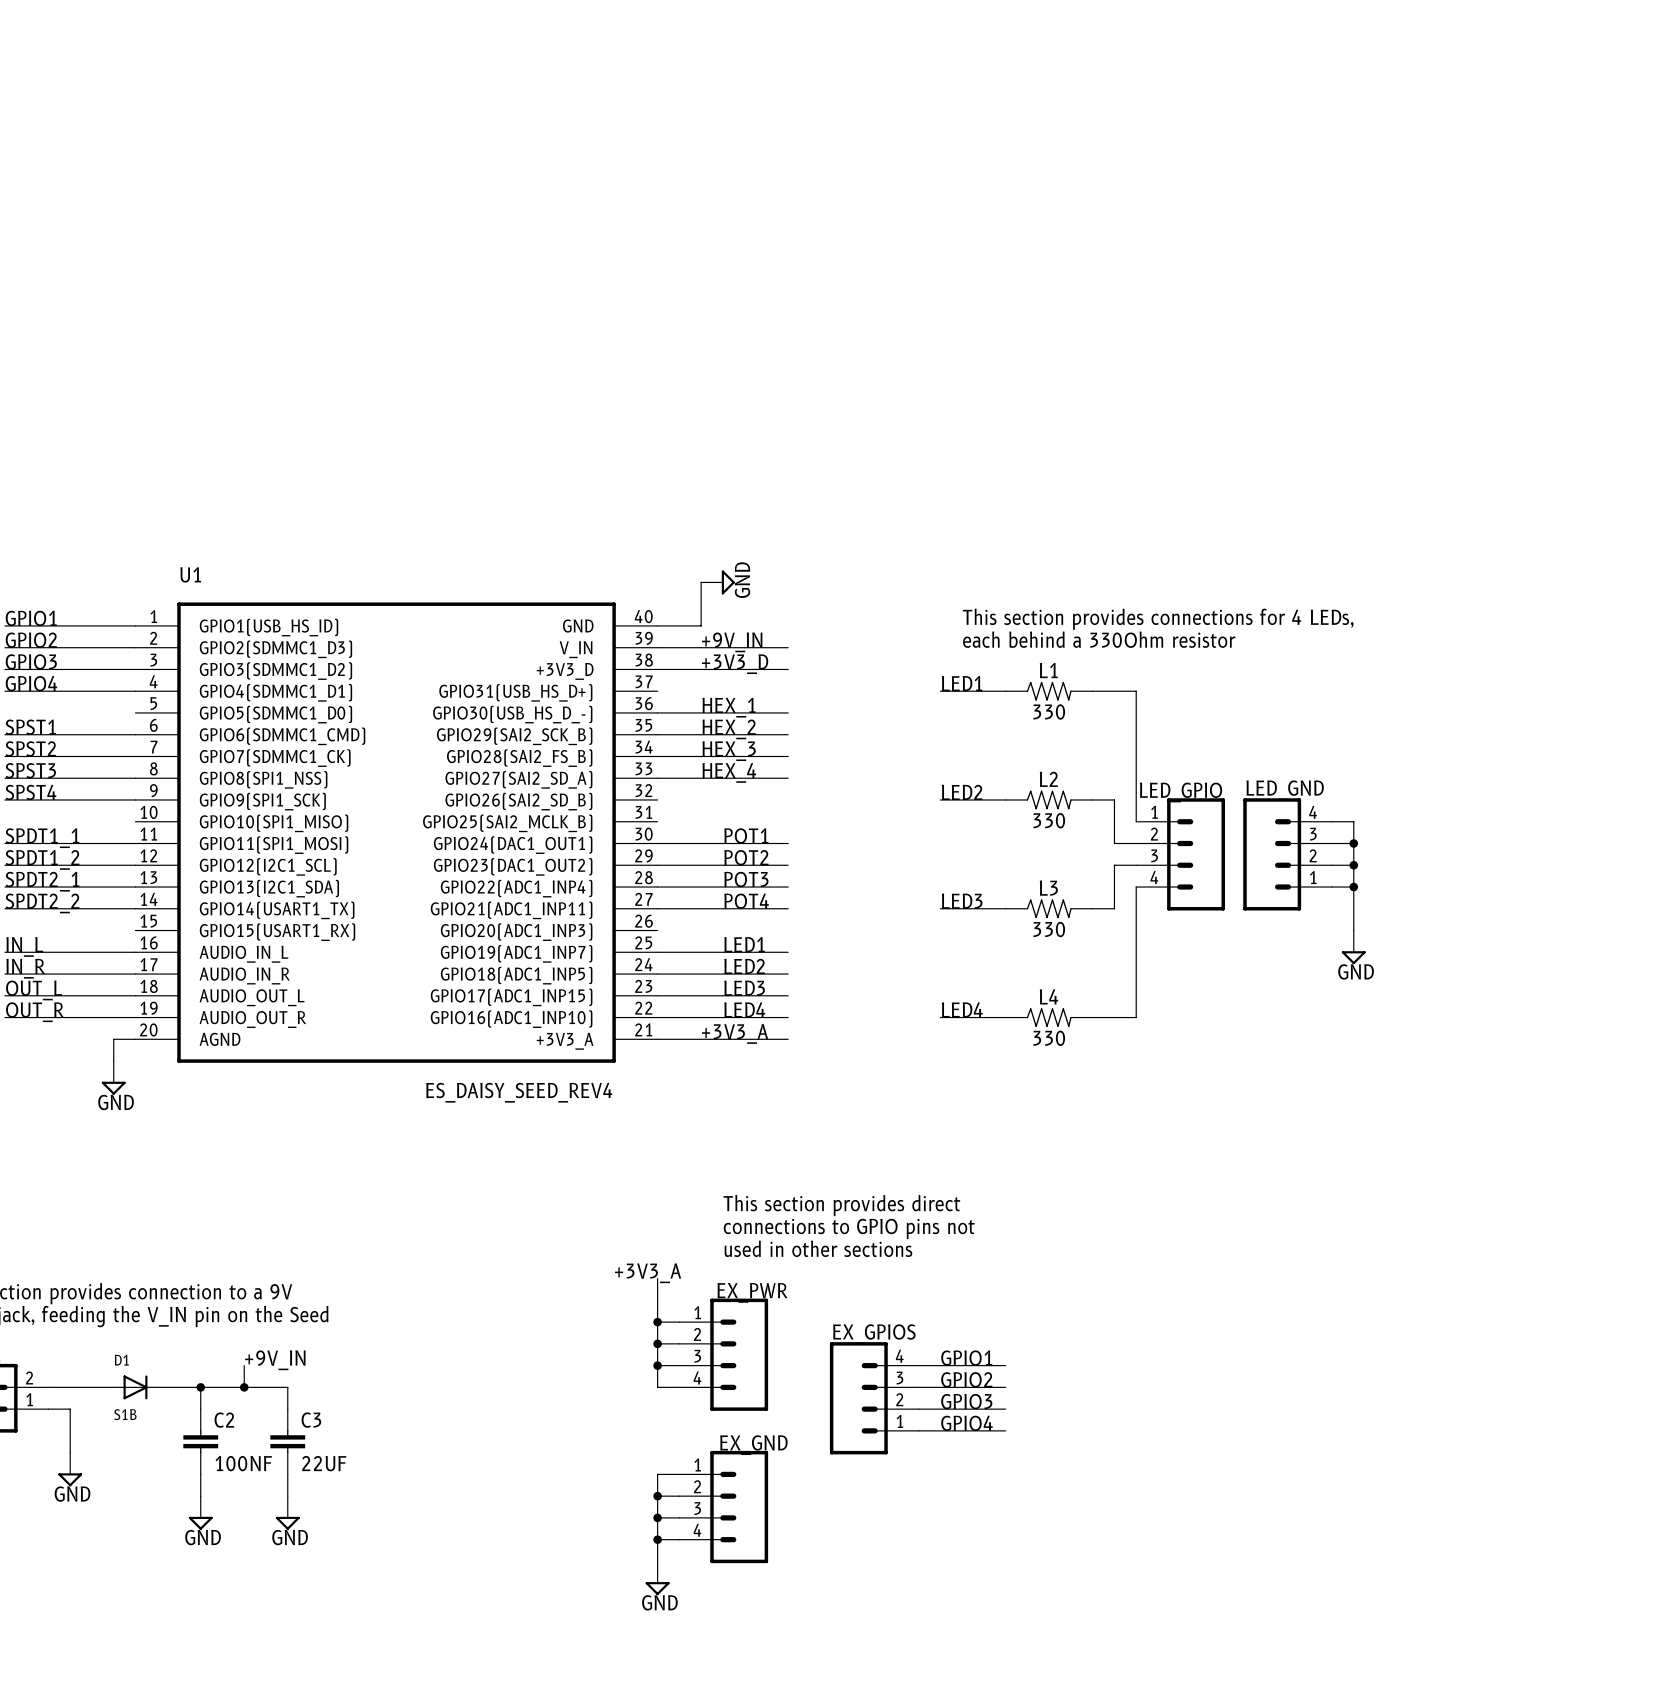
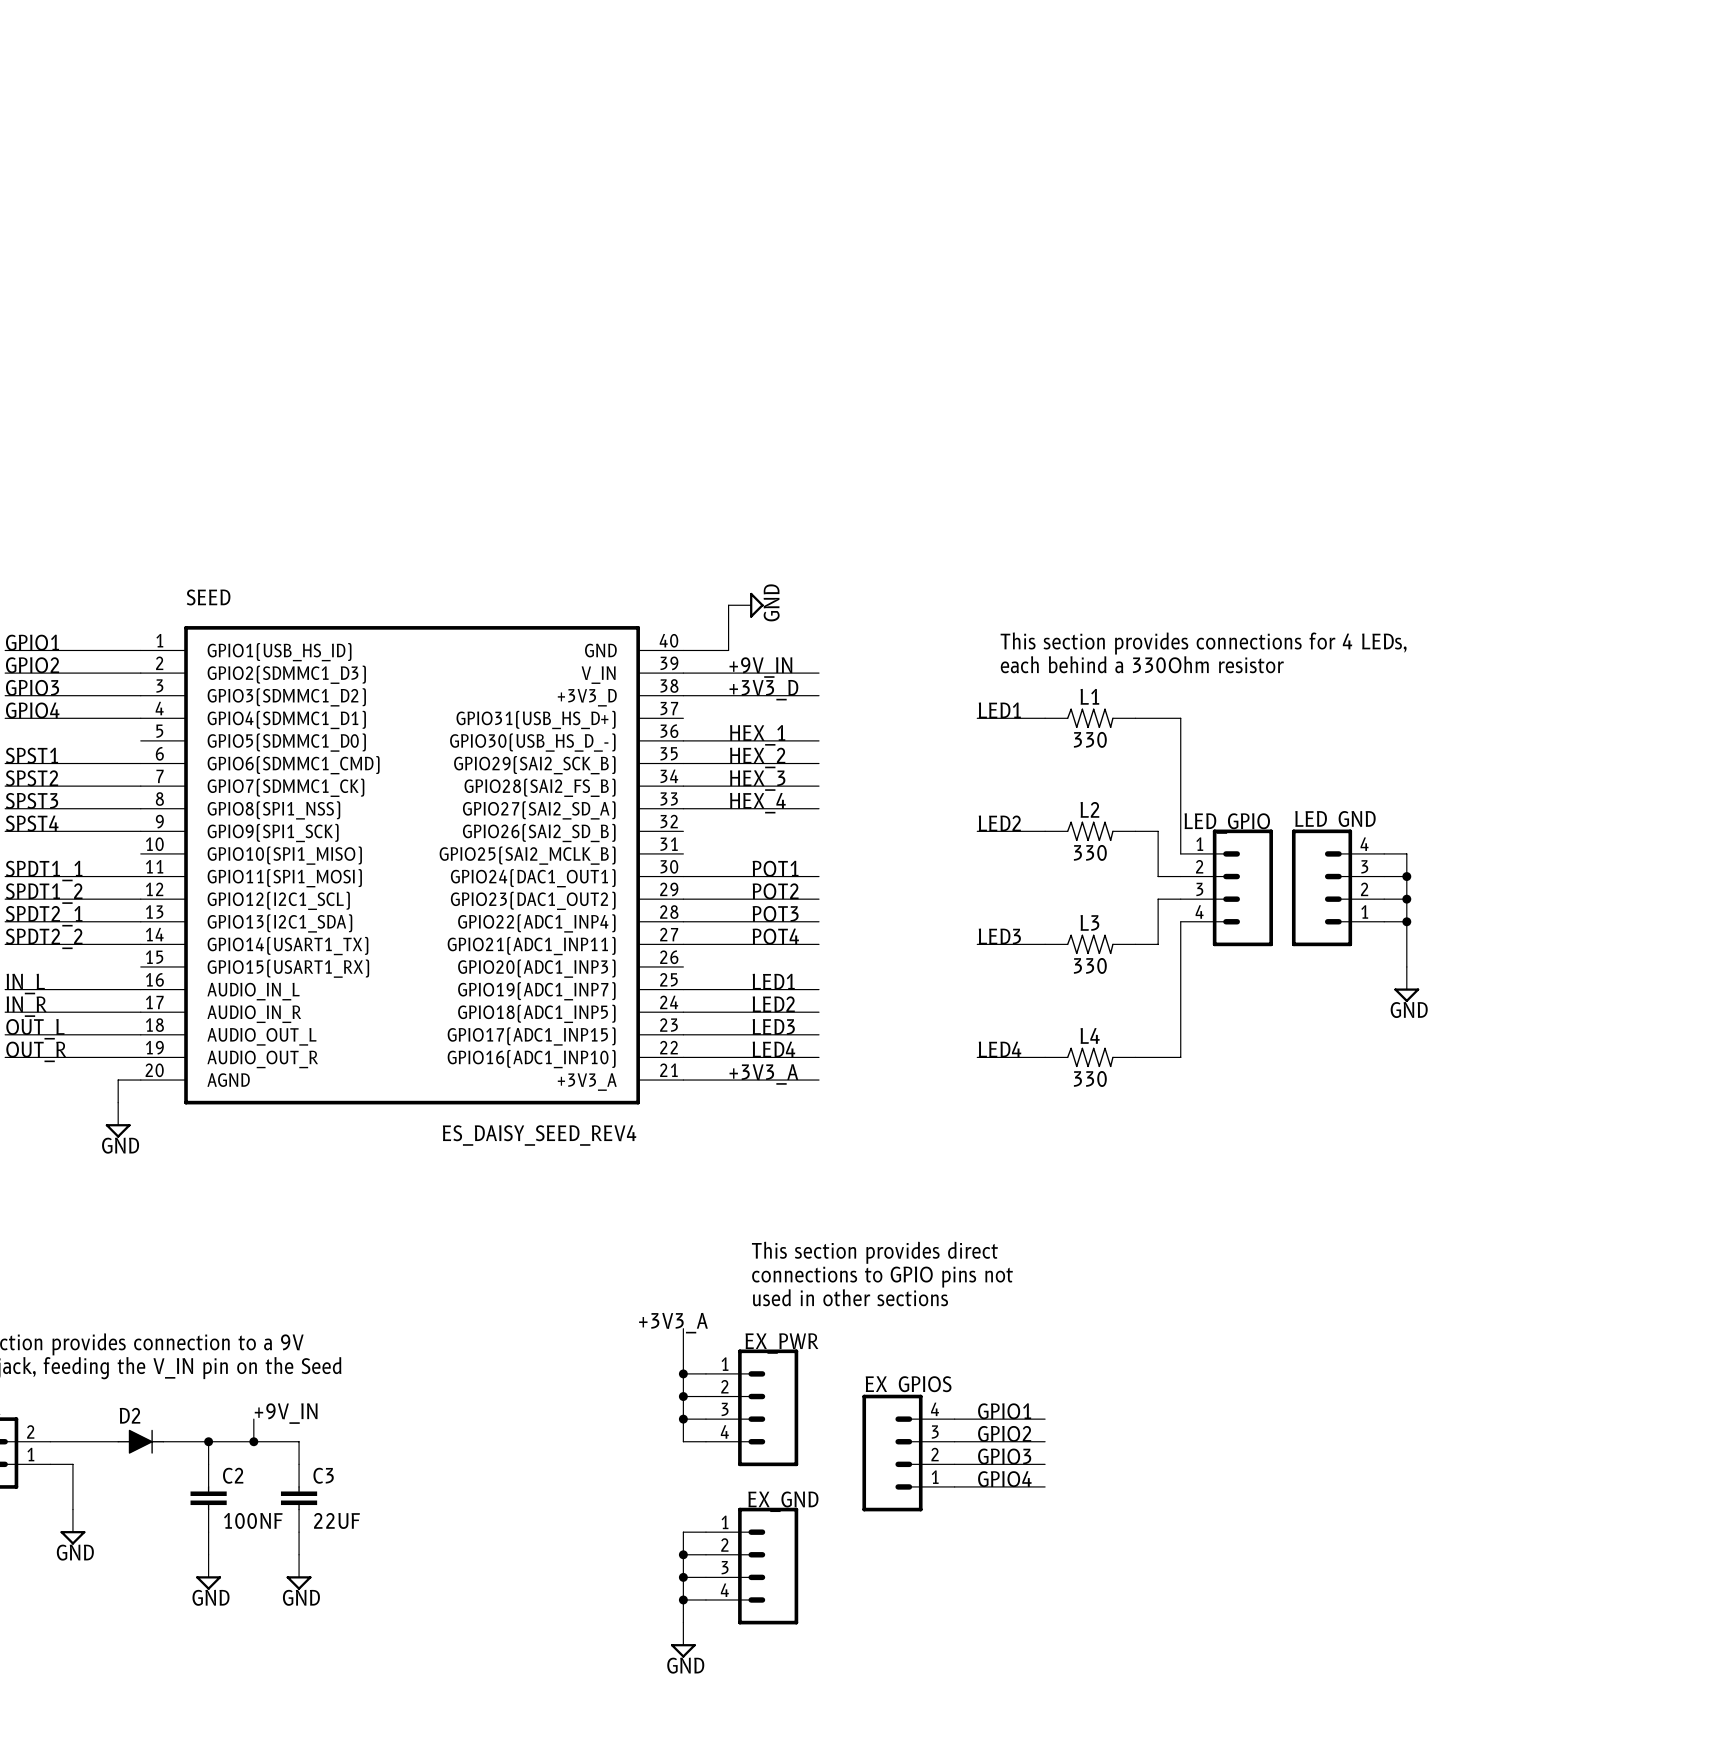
U1 name: U1 (190, 574) -> SEED (208, 597)
D1: S1B (135, 1387) -> none
D2: none -> (140, 1441)

